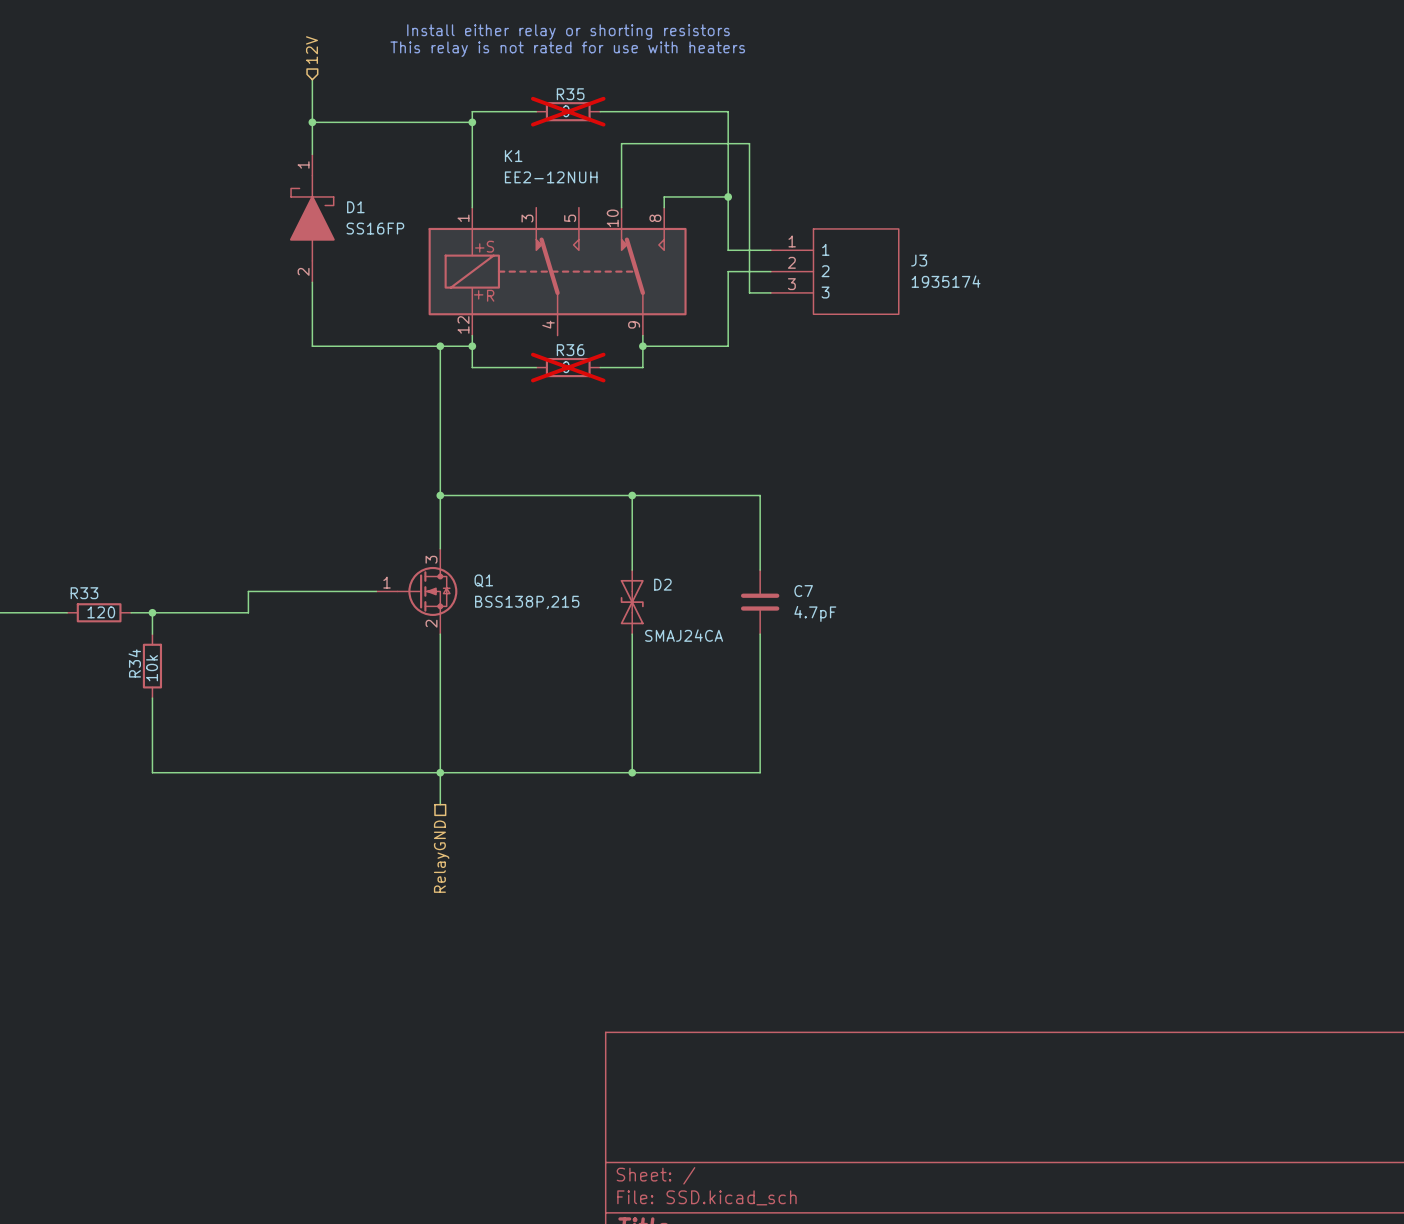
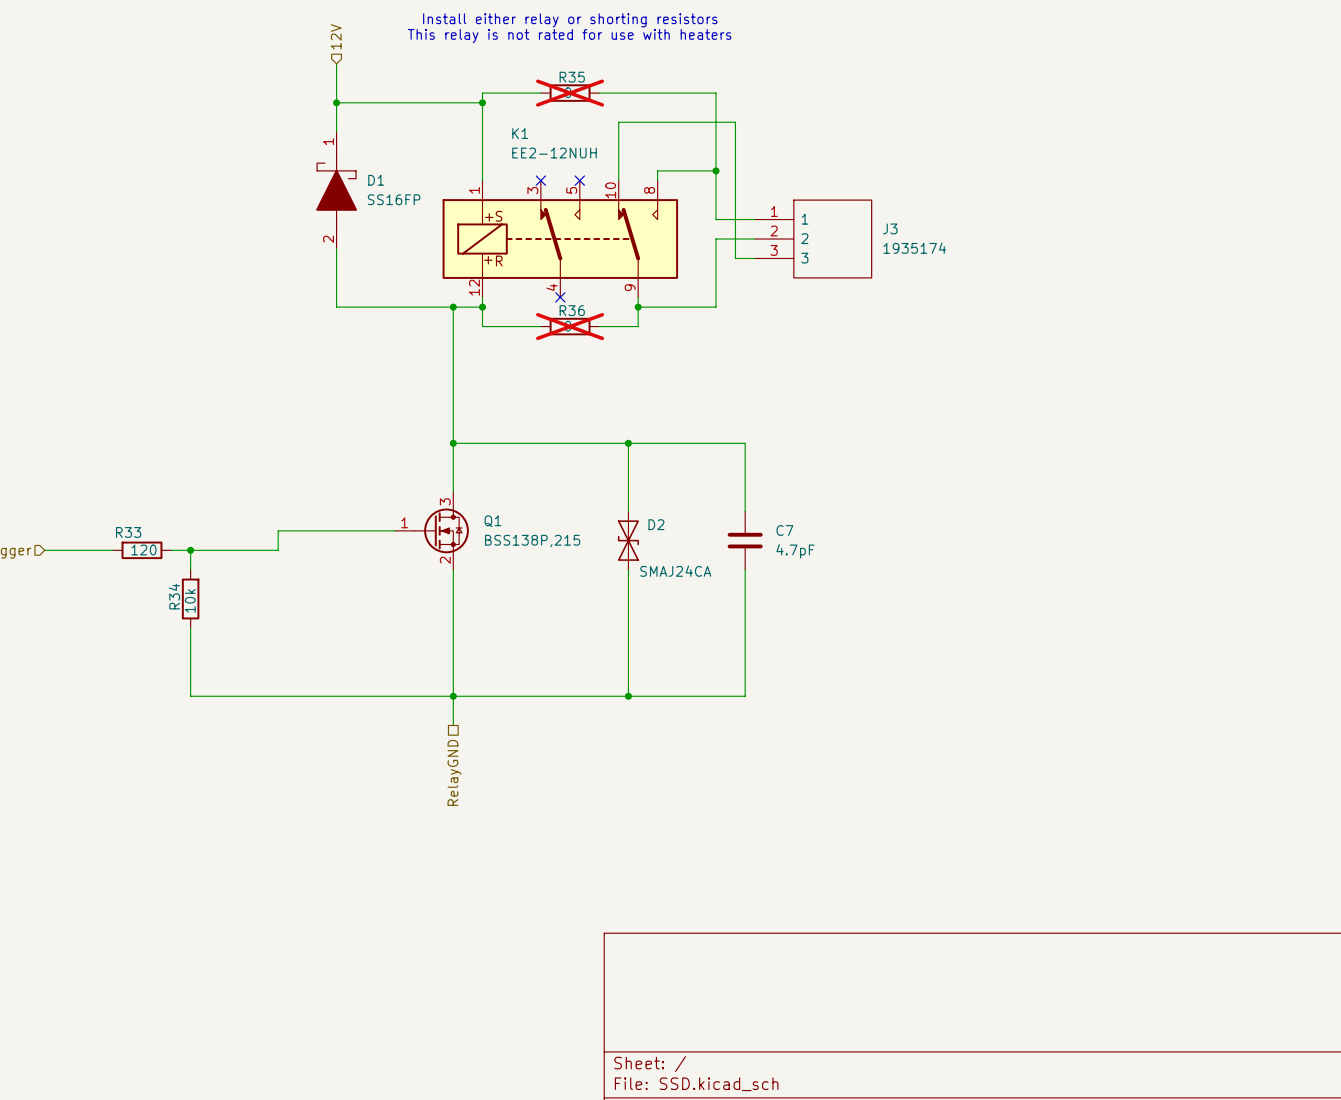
no-connect mark: none -> (540, 180)
no-connect mark: none -> (579, 180)
no-connect mark: none -> (560, 297)

